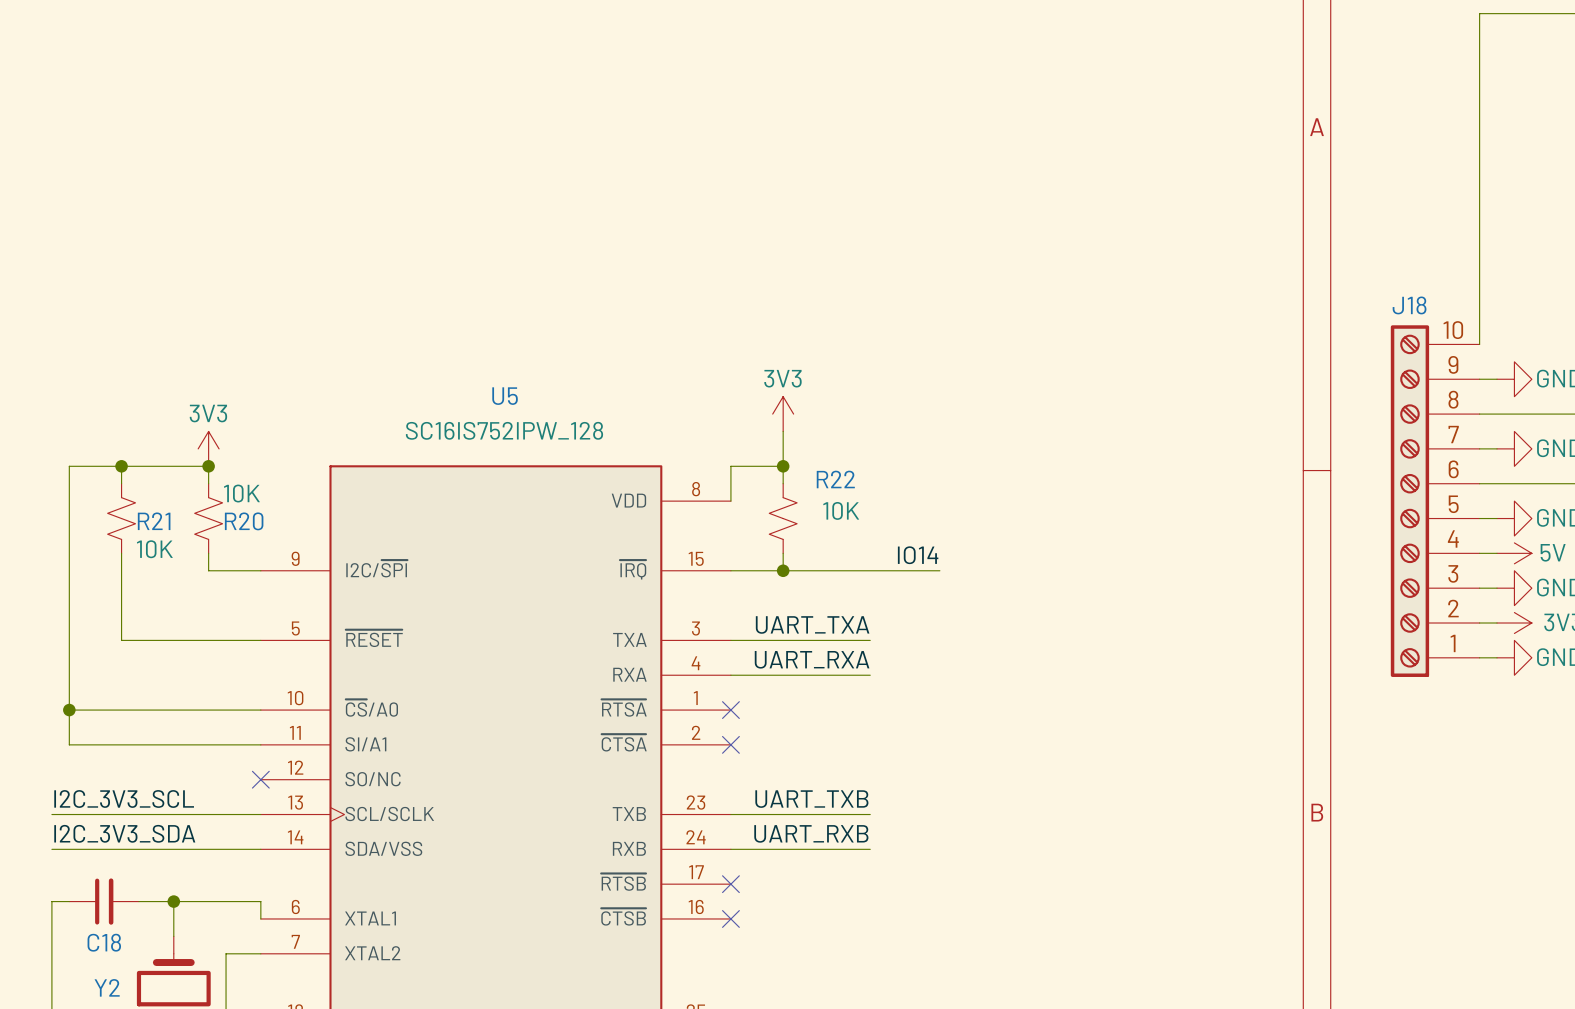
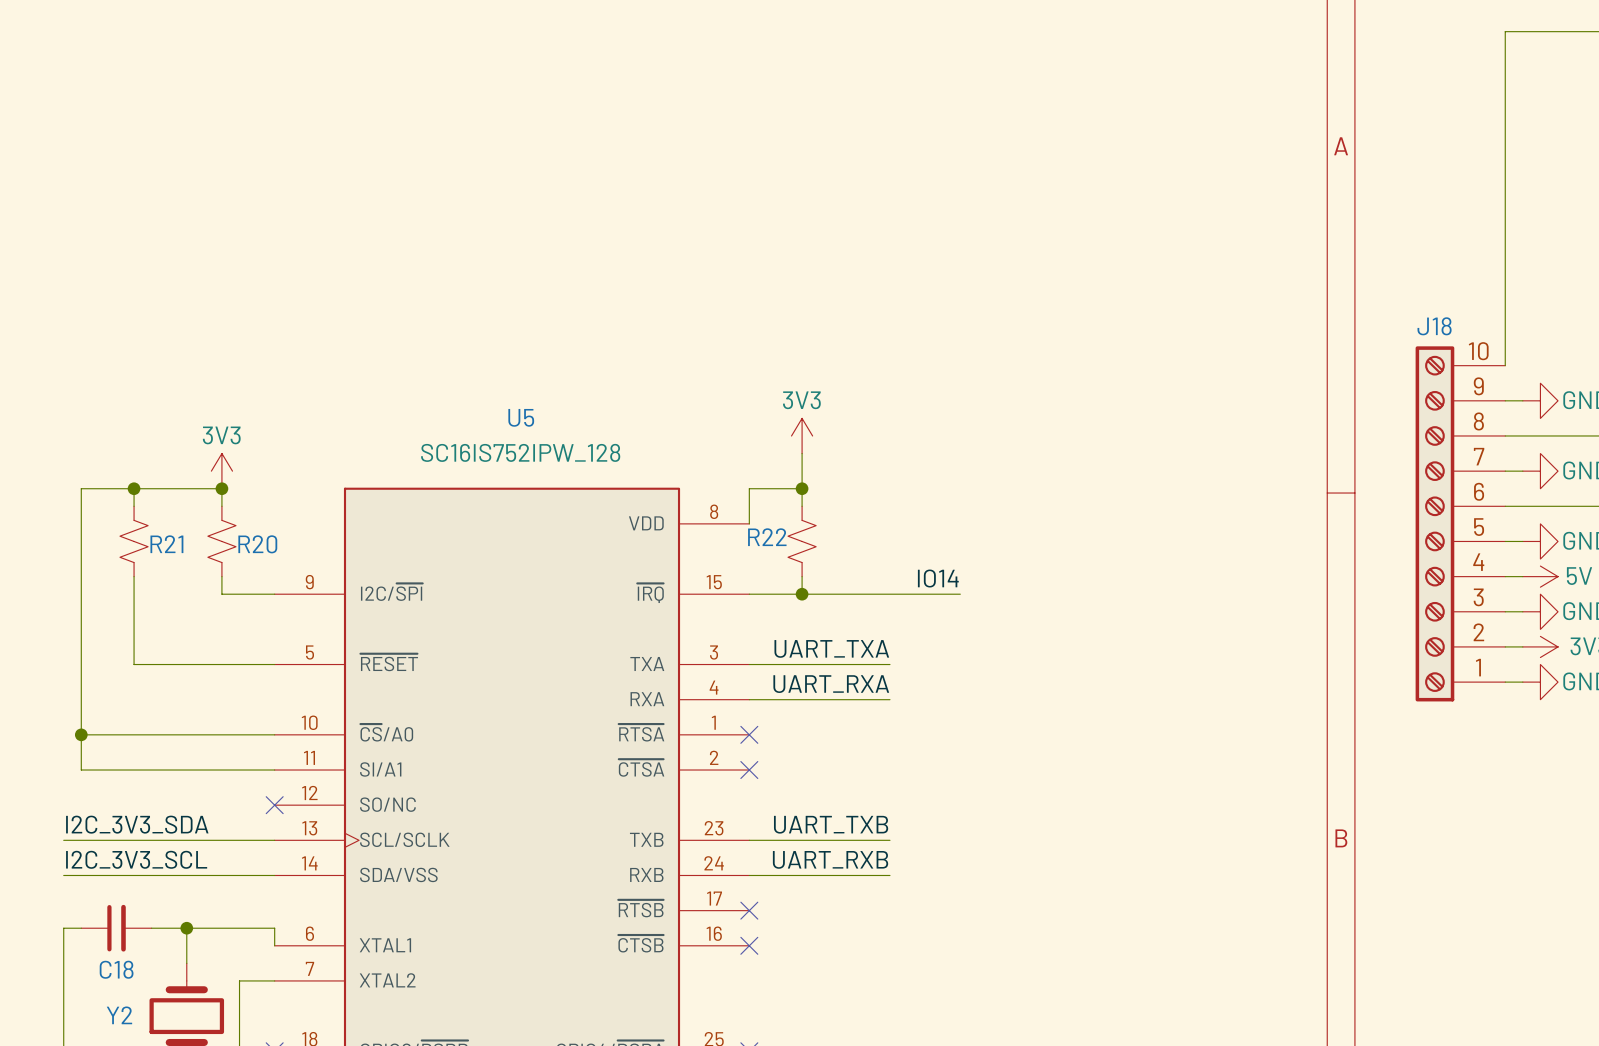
R22 name position: R22 (835, 479) -> R22 (767, 537)
R20 value: 10K (241, 493) -> none
R22 value: 10K (841, 510) -> none
R21 value: 10K (154, 549) -> none
label: I2C_3V3_SCL (124, 798) -> I2C_3V3_SDA (137, 824)
label: I2C_3V3_SDA (124, 833) -> I2C_3V3_SCL (136, 859)

